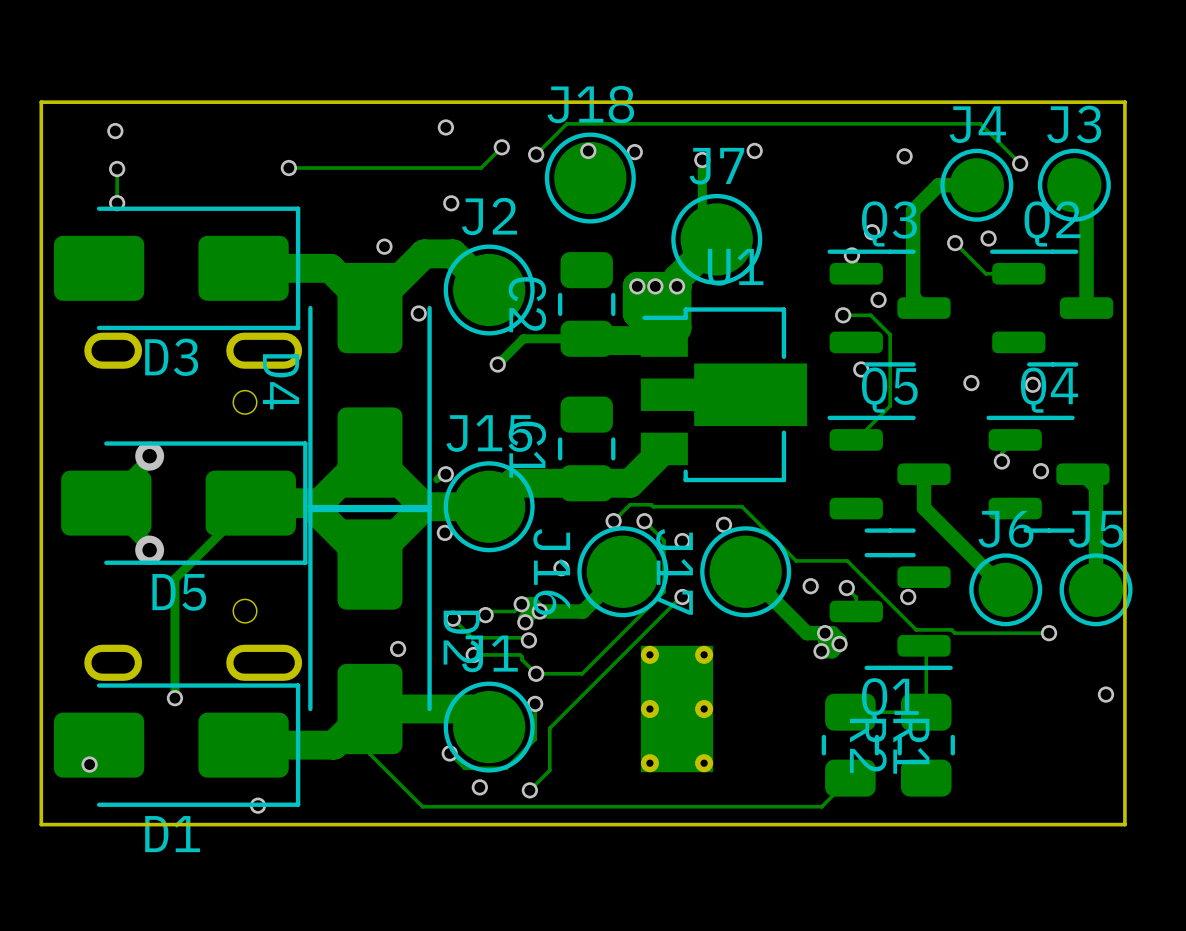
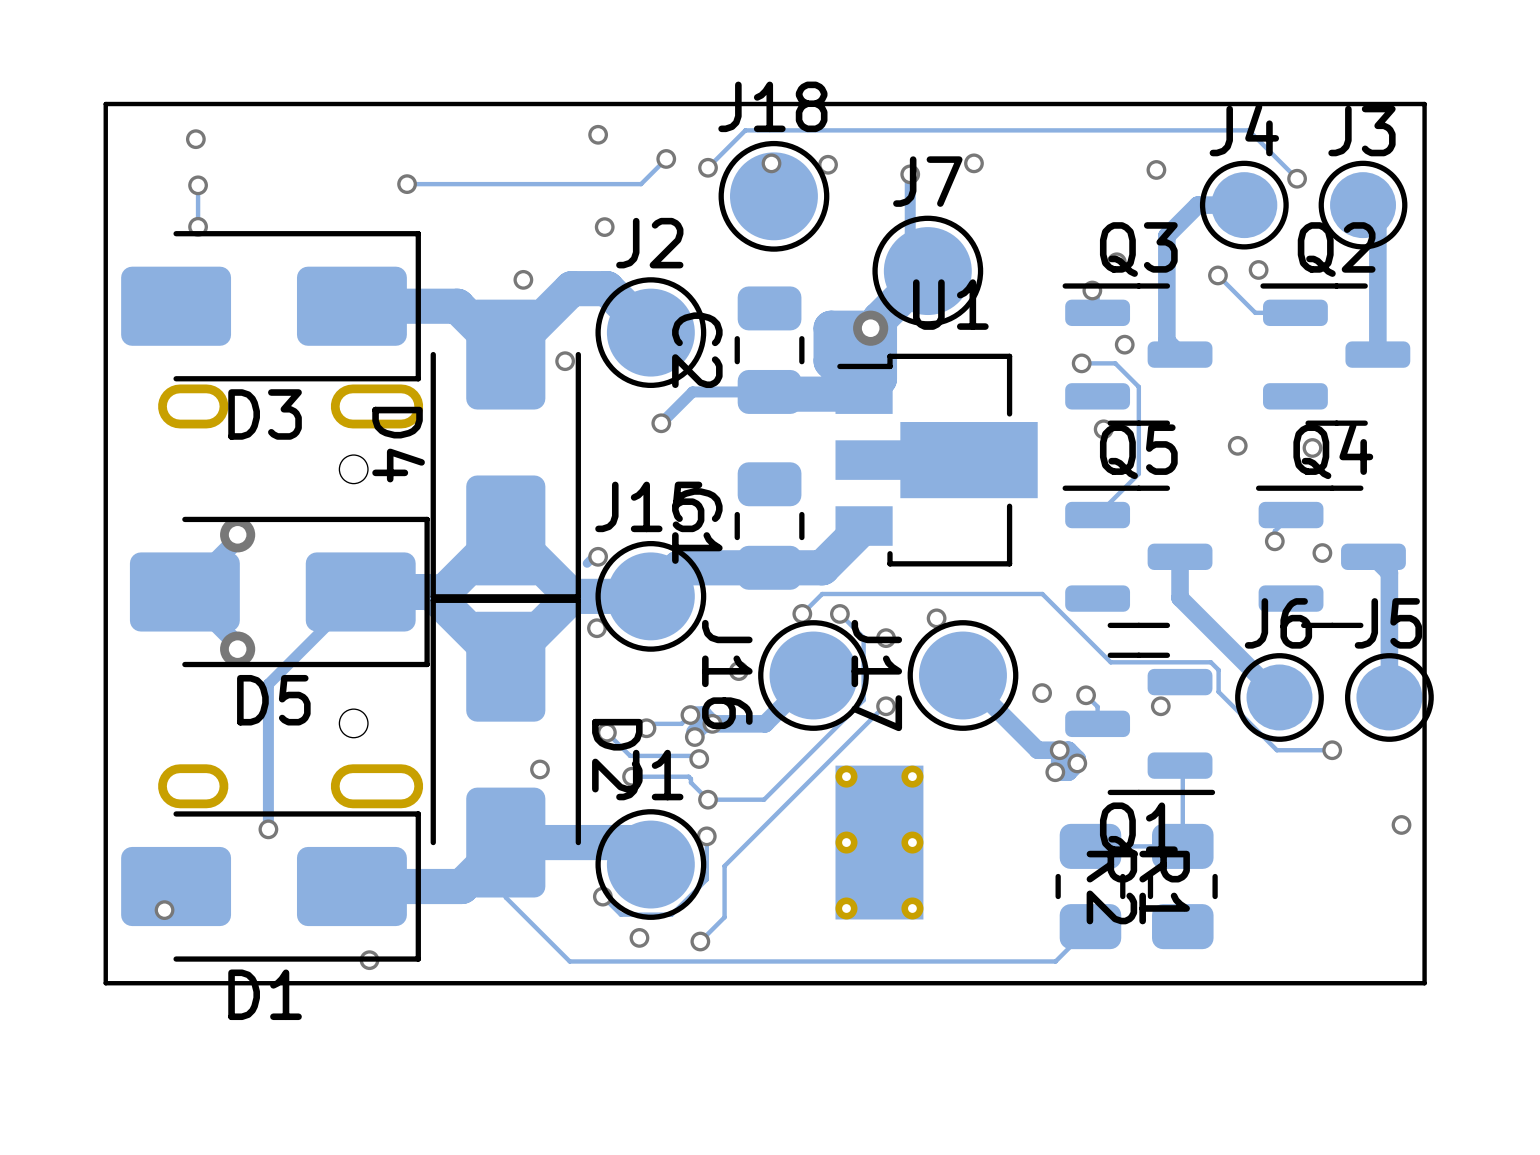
via: (637, 286) -> none
via: (655, 286) -> none
via: none -> (870, 328)
via: (677, 286) -> none
track: (651, 504) (653, 506) (742, 506) (796, 560) (847, 560) (916, 629) (951, 629) (954, 633) (1003, 633) -> (848, 593) (1042, 593) (1110, 662) (1210, 662) (1218, 670) (1218, 691) (1276, 750)

